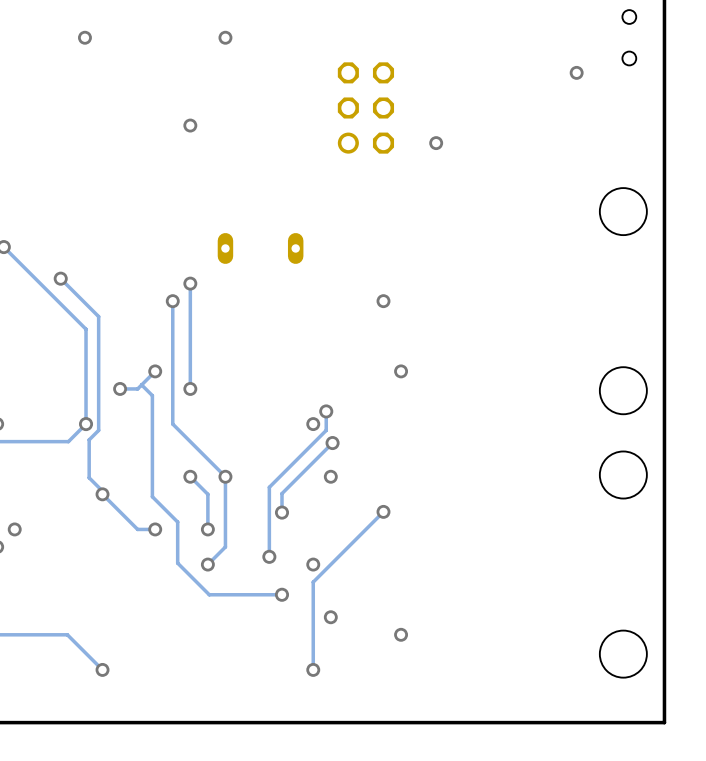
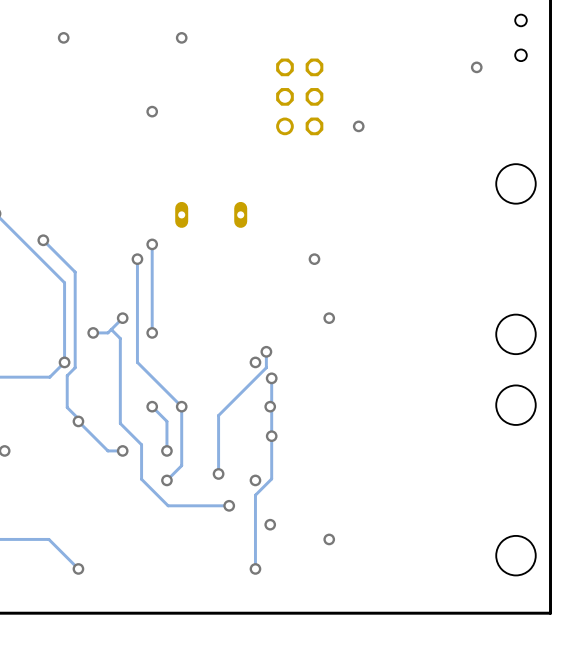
track: (332, 443) (281, 493) (281, 512) -> (271, 378) (271, 478)
track: (383, 511) (332, 562) -> none
via position: (383, 511) -> (271, 436)
via: (281, 512) -> none

